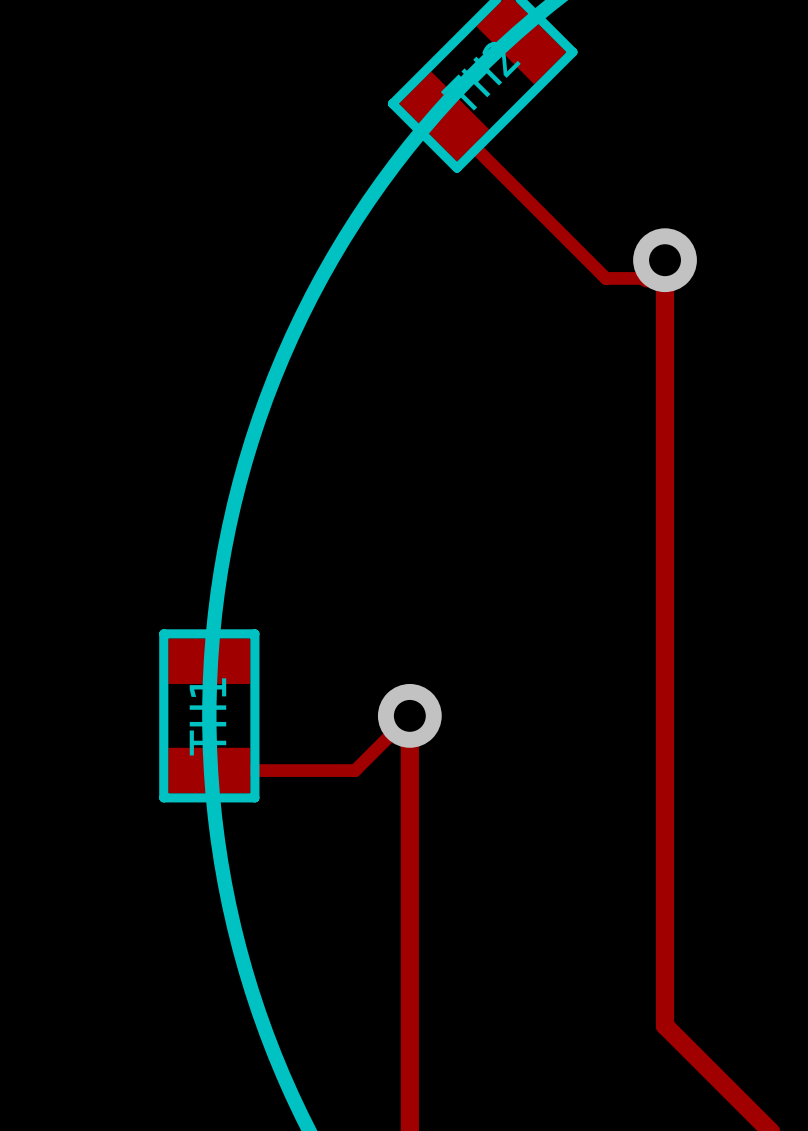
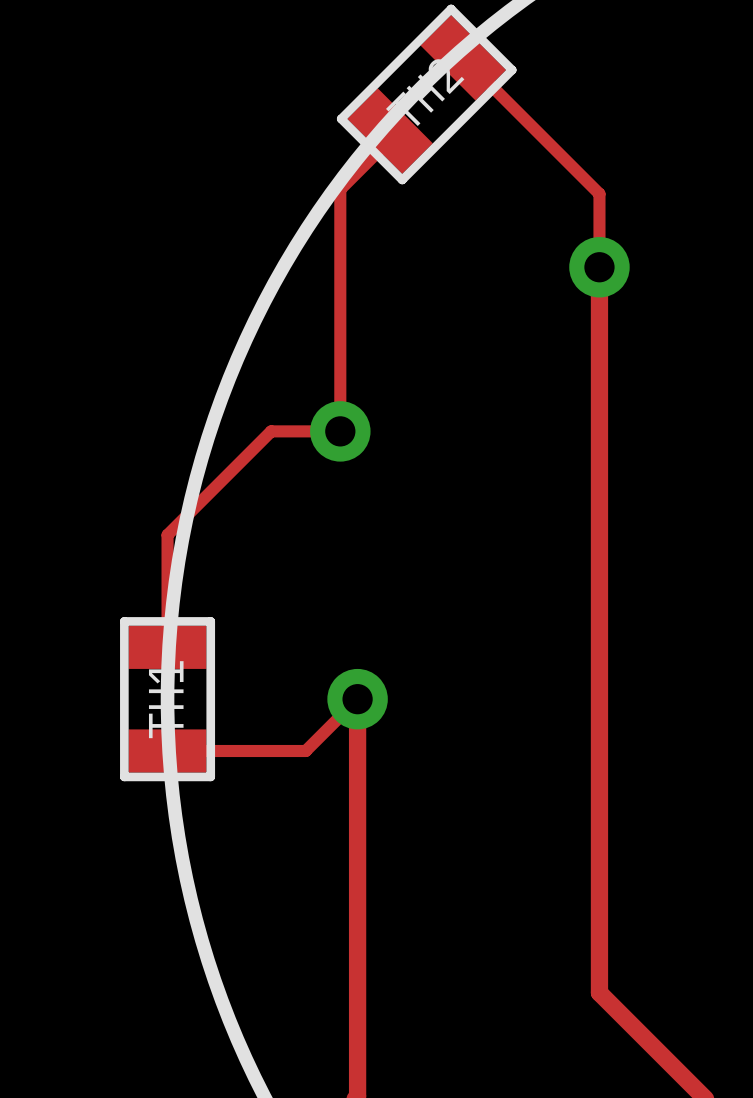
track: (444, 116) (605, 278) (646, 278) (665, 260) -> (463, 57) (599, 193) (599, 267)
track: none -> (390, 131) (390, 139) (340, 189) (340, 431) (271, 431) (167, 535) (167, 647)
via: none -> (340, 431)

